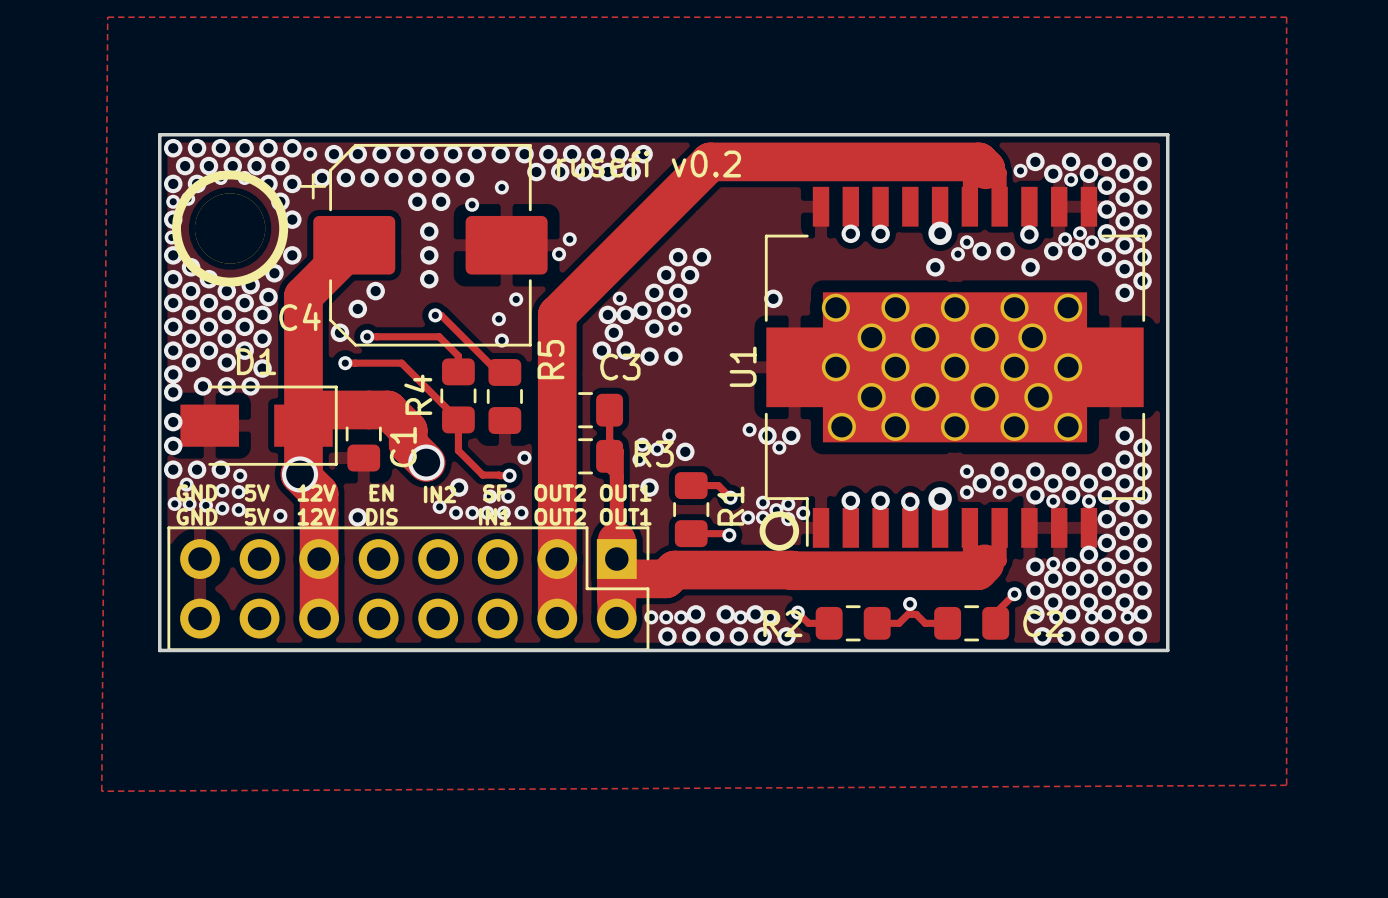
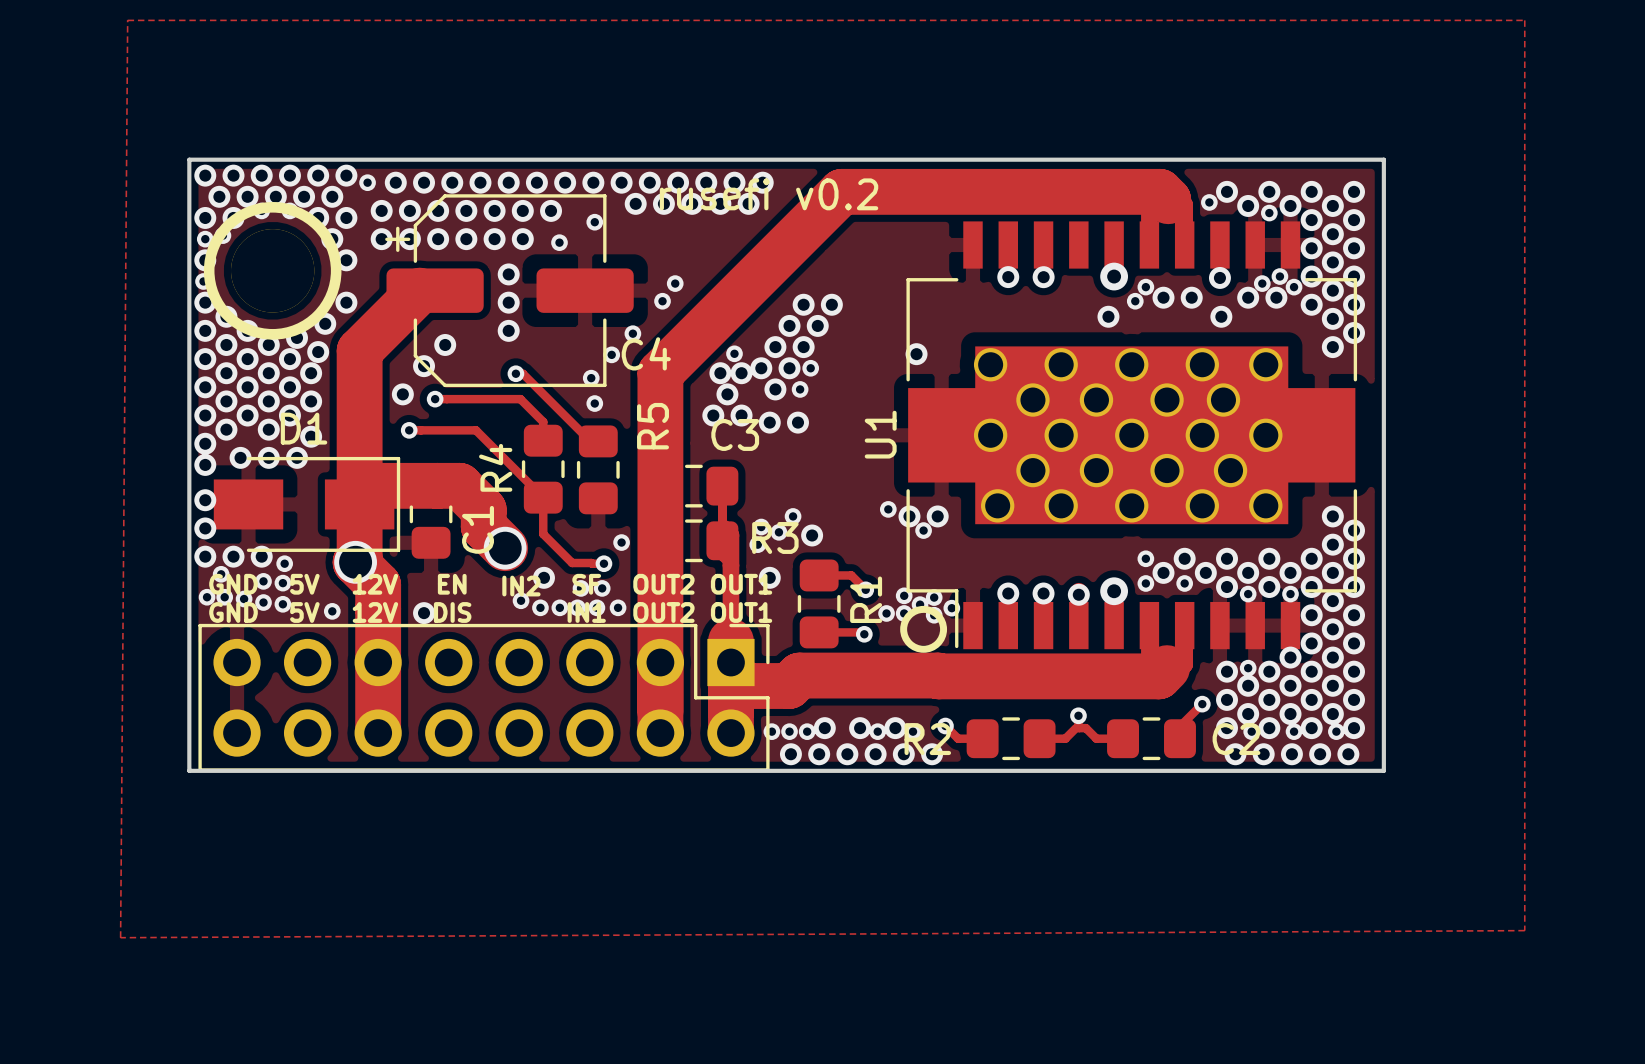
C4 footprint: [300, 143, 548, 347] -> [385, 194, 634, 388]
via: none -> (381, 239)
via: none -> (409, 239)
via: none -> (438, 239)
via: none -> (466, 239)
via: none -> (632, 333)
C4 name position: C4 (300, 317) -> C4 (646, 353)

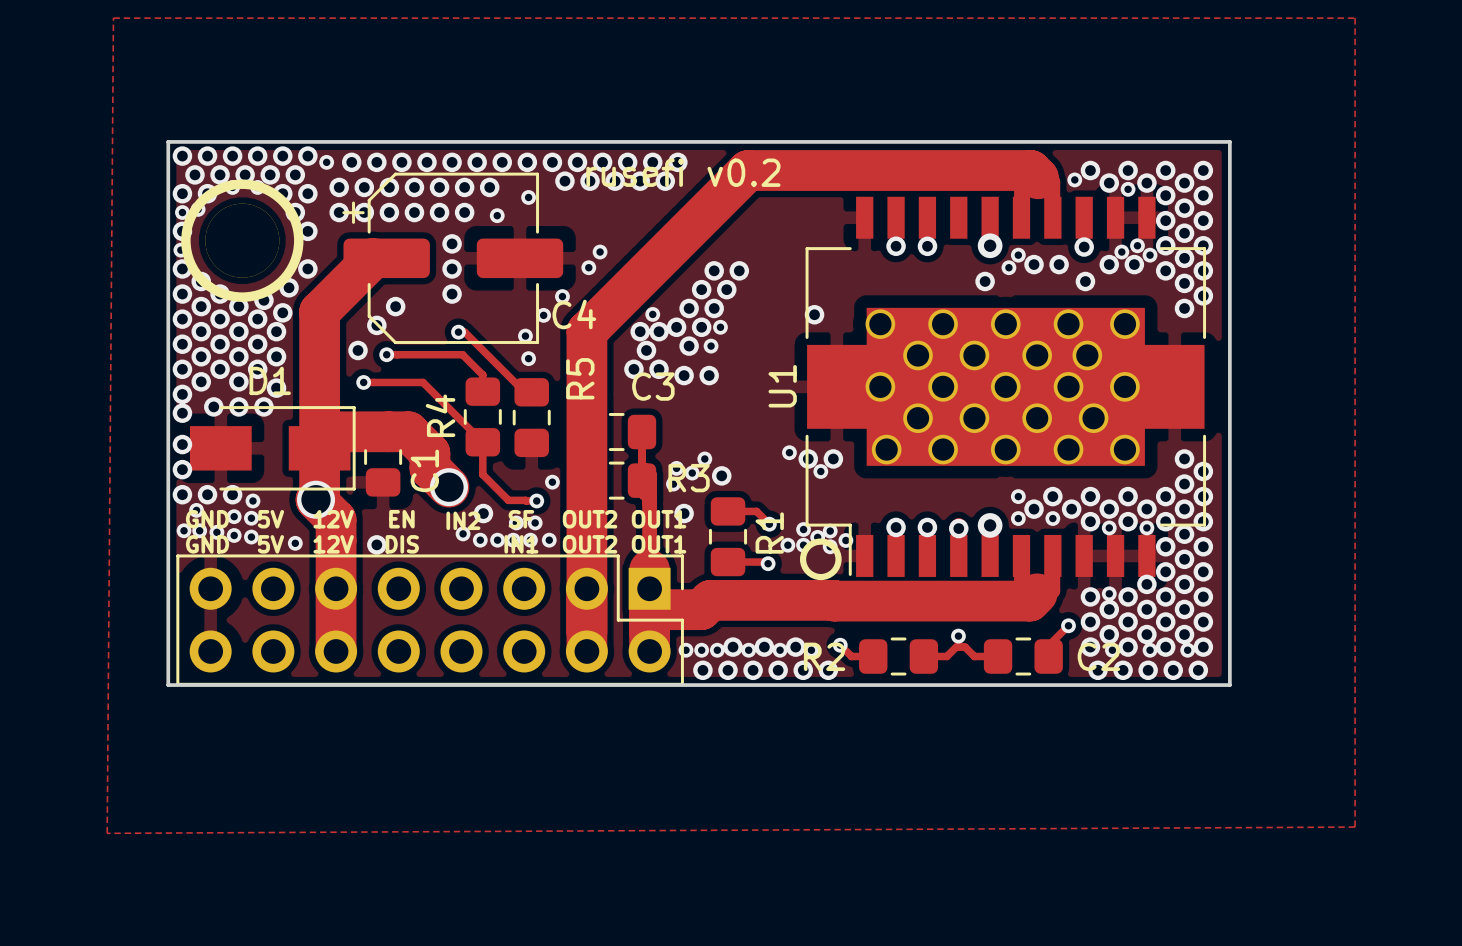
via: none -> (748, 650)

